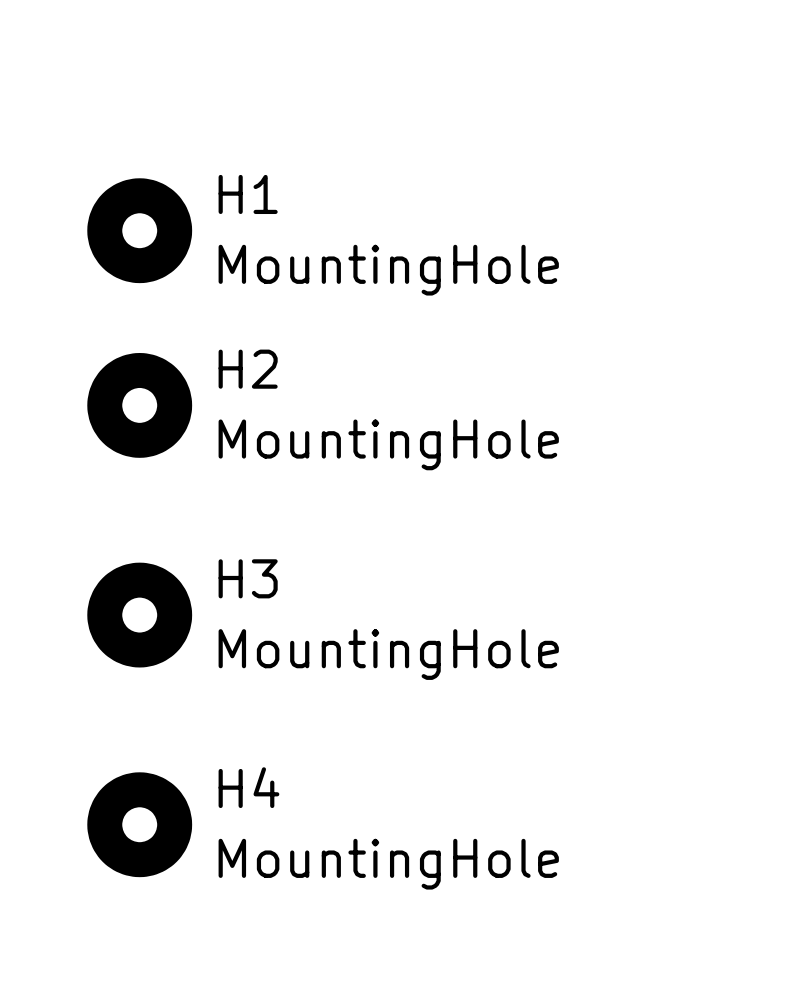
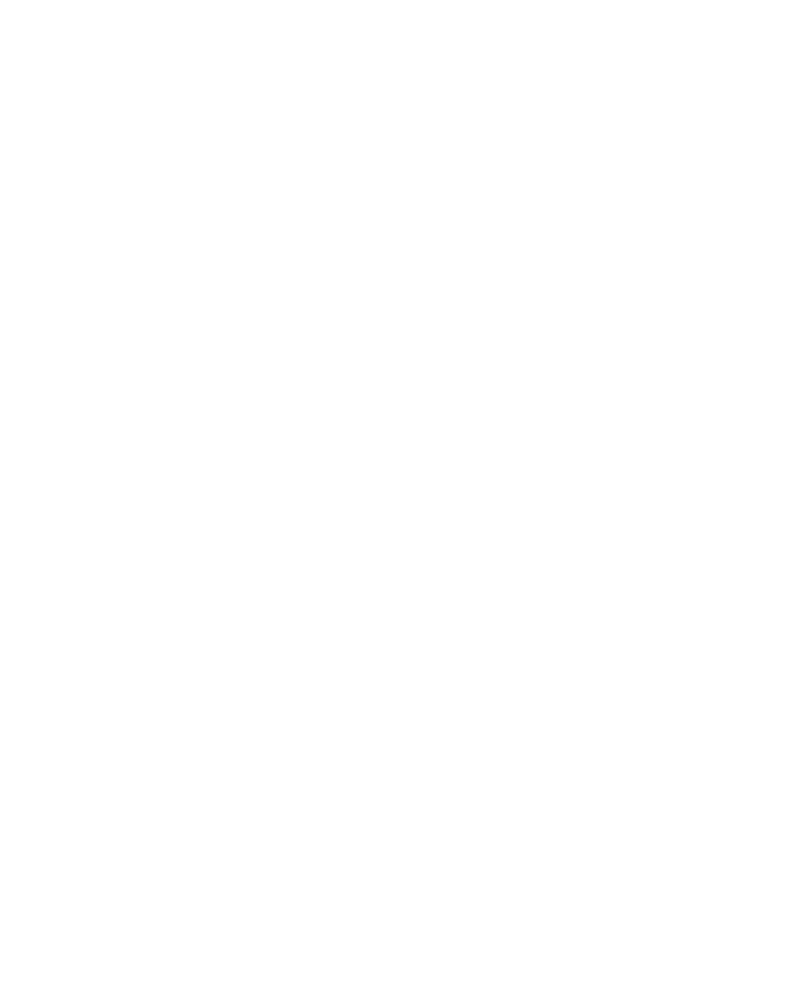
H1: MountingHole (139, 230) -> none
H2: MountingHole (139, 405) -> none
H3: MountingHole (139, 615) -> none
H4: MountingHole (139, 824) -> none

